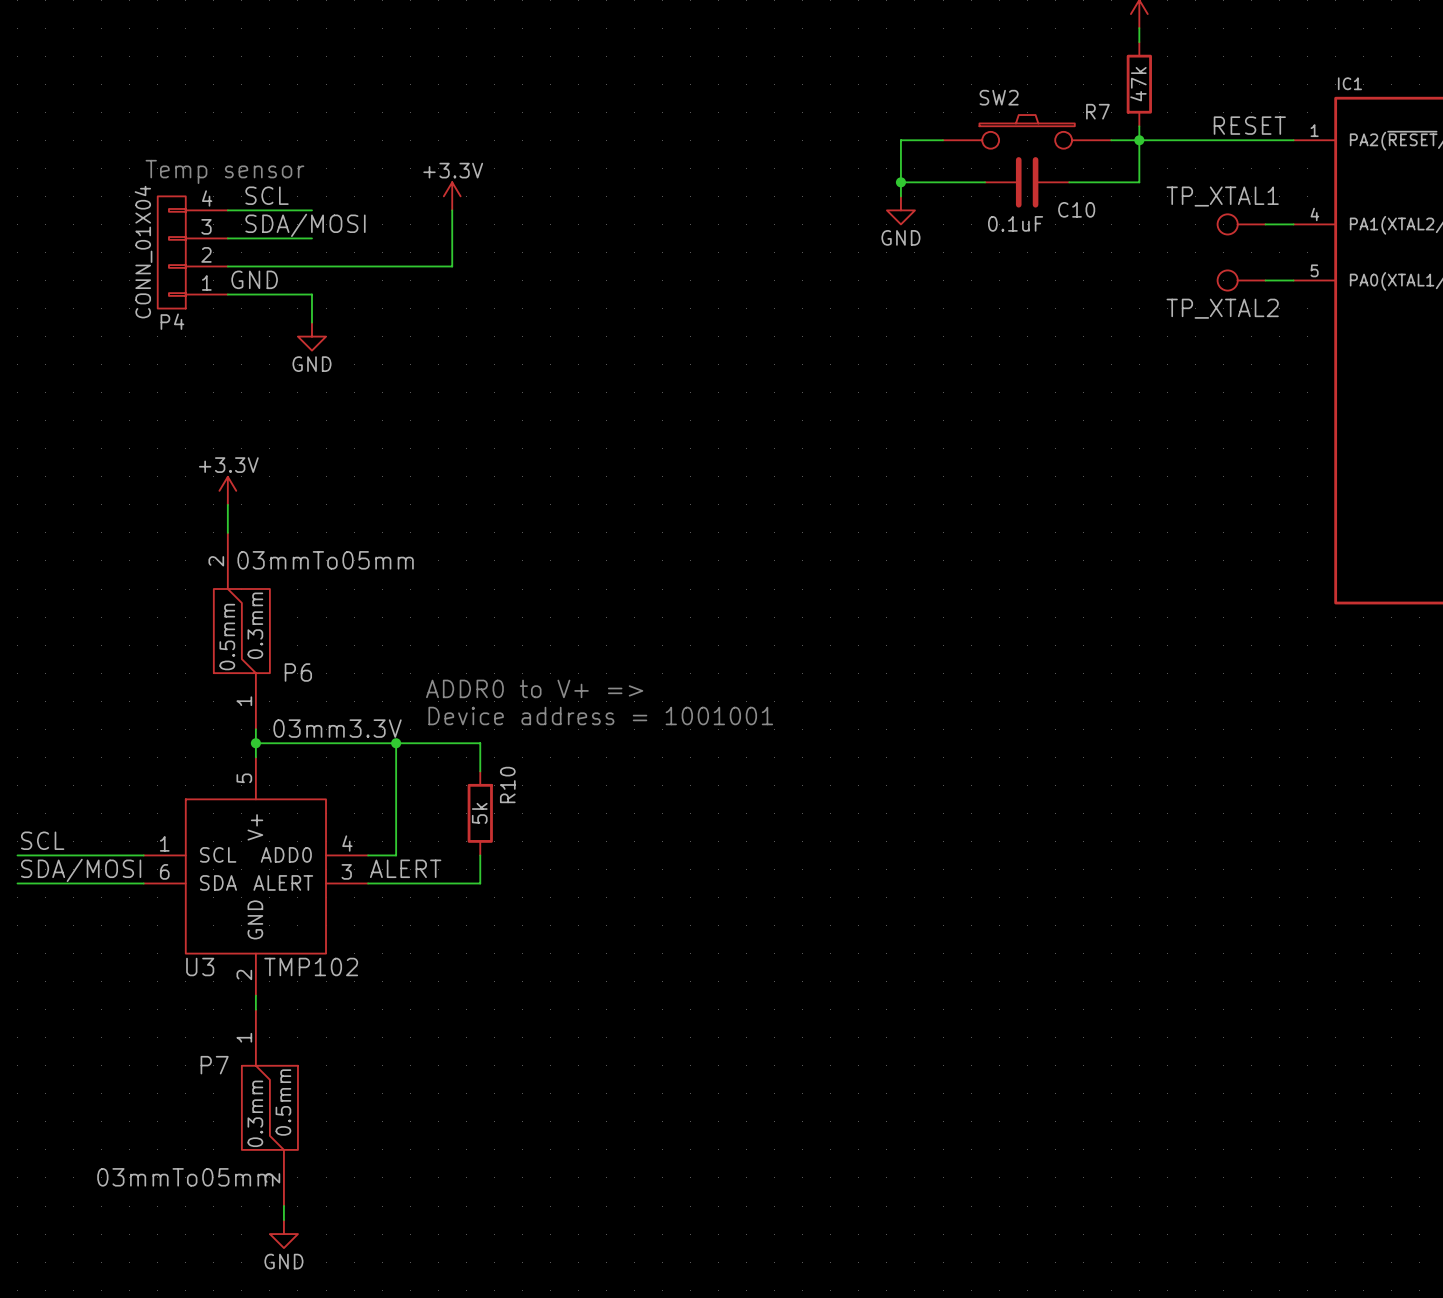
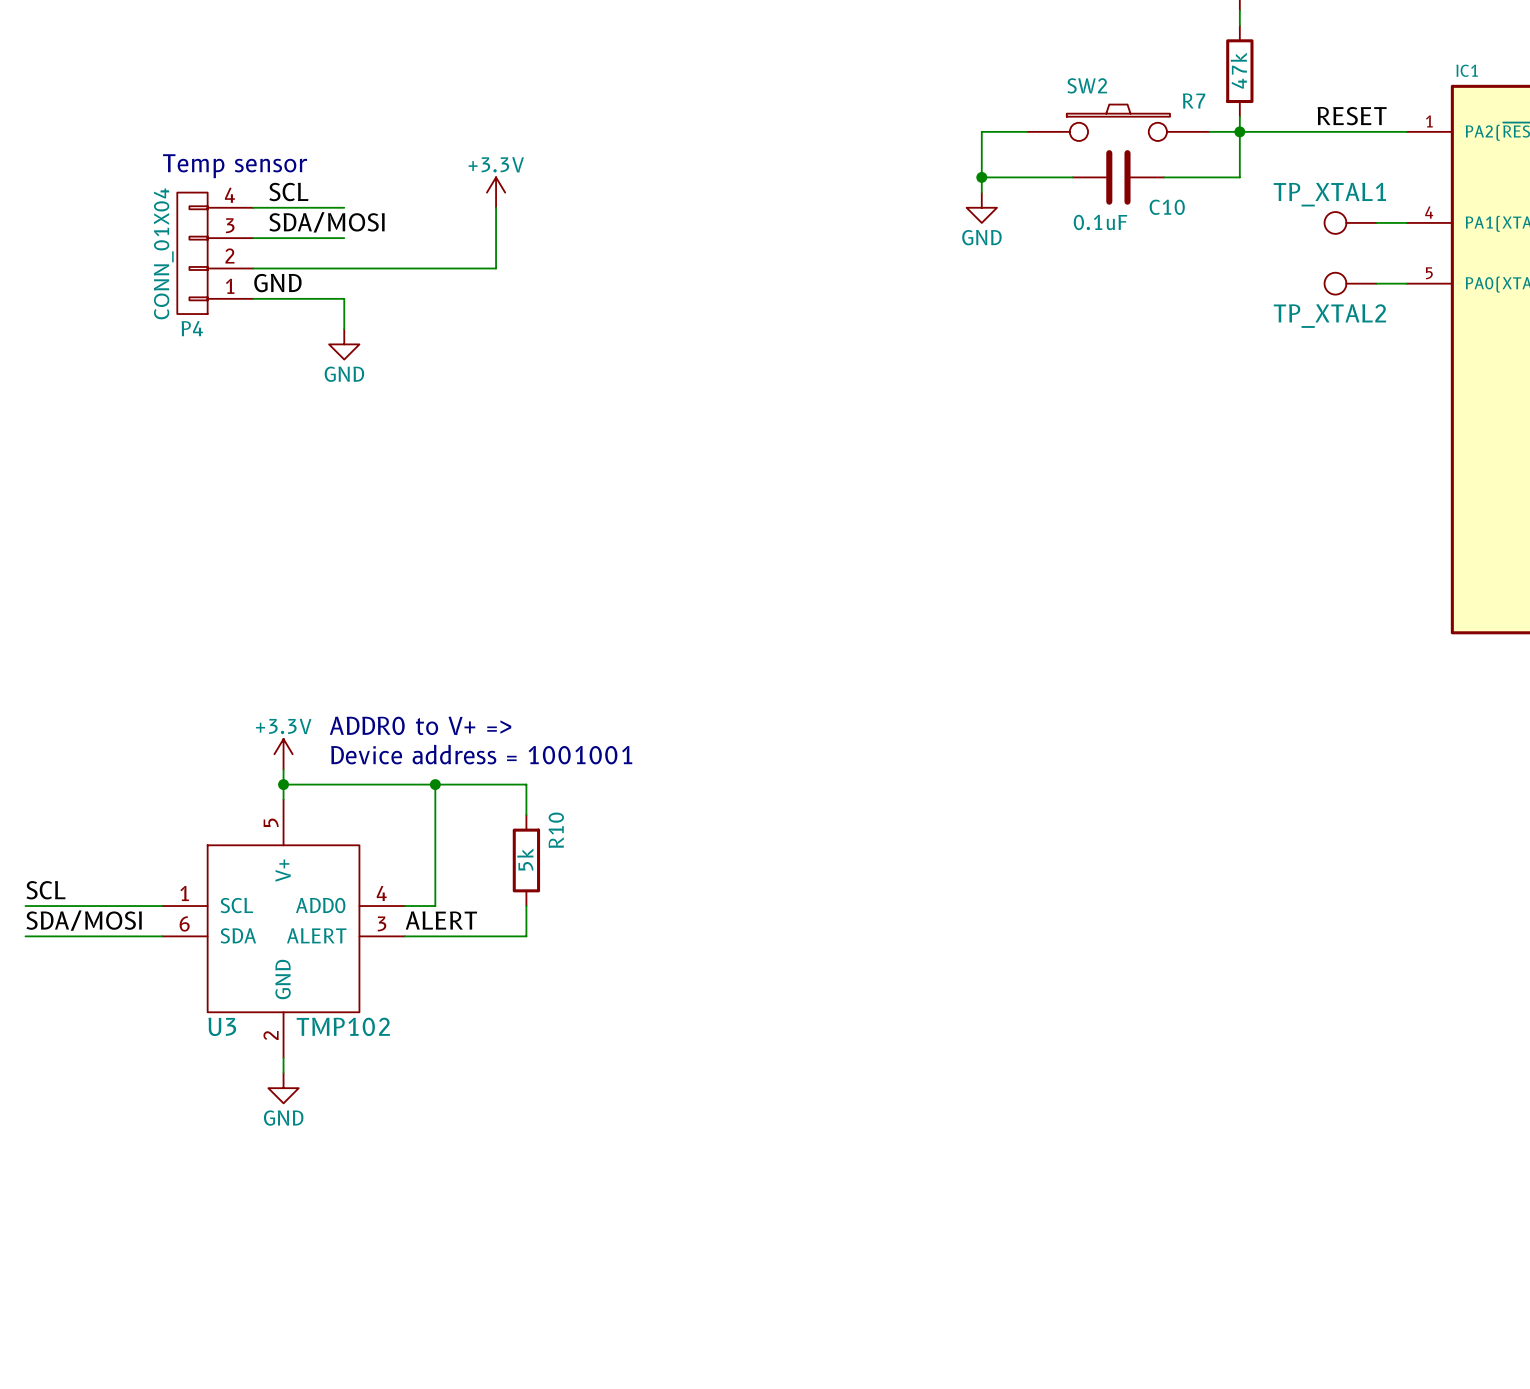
power symbol position: +3.3V (227, 490) -> +3.3V (283, 754)
wire: (227, 504) (227, 532) -> none
P6: 03mmTo05mm (241, 631) -> none
text position: ADDR0 to V+ => (534, 688) -> ADDR0 to V+ => (420, 725)
text position: Device address = 1001001 (600, 716) -> Device address = 1001001 (481, 754)
label: 03mm3.3V (337, 728) -> none
P7: 03mmTo05mm (269, 1107) -> none
wire: (283, 1206) (283, 1220) -> none
power symbol position: GND (283, 1234) -> GND (283, 1088)

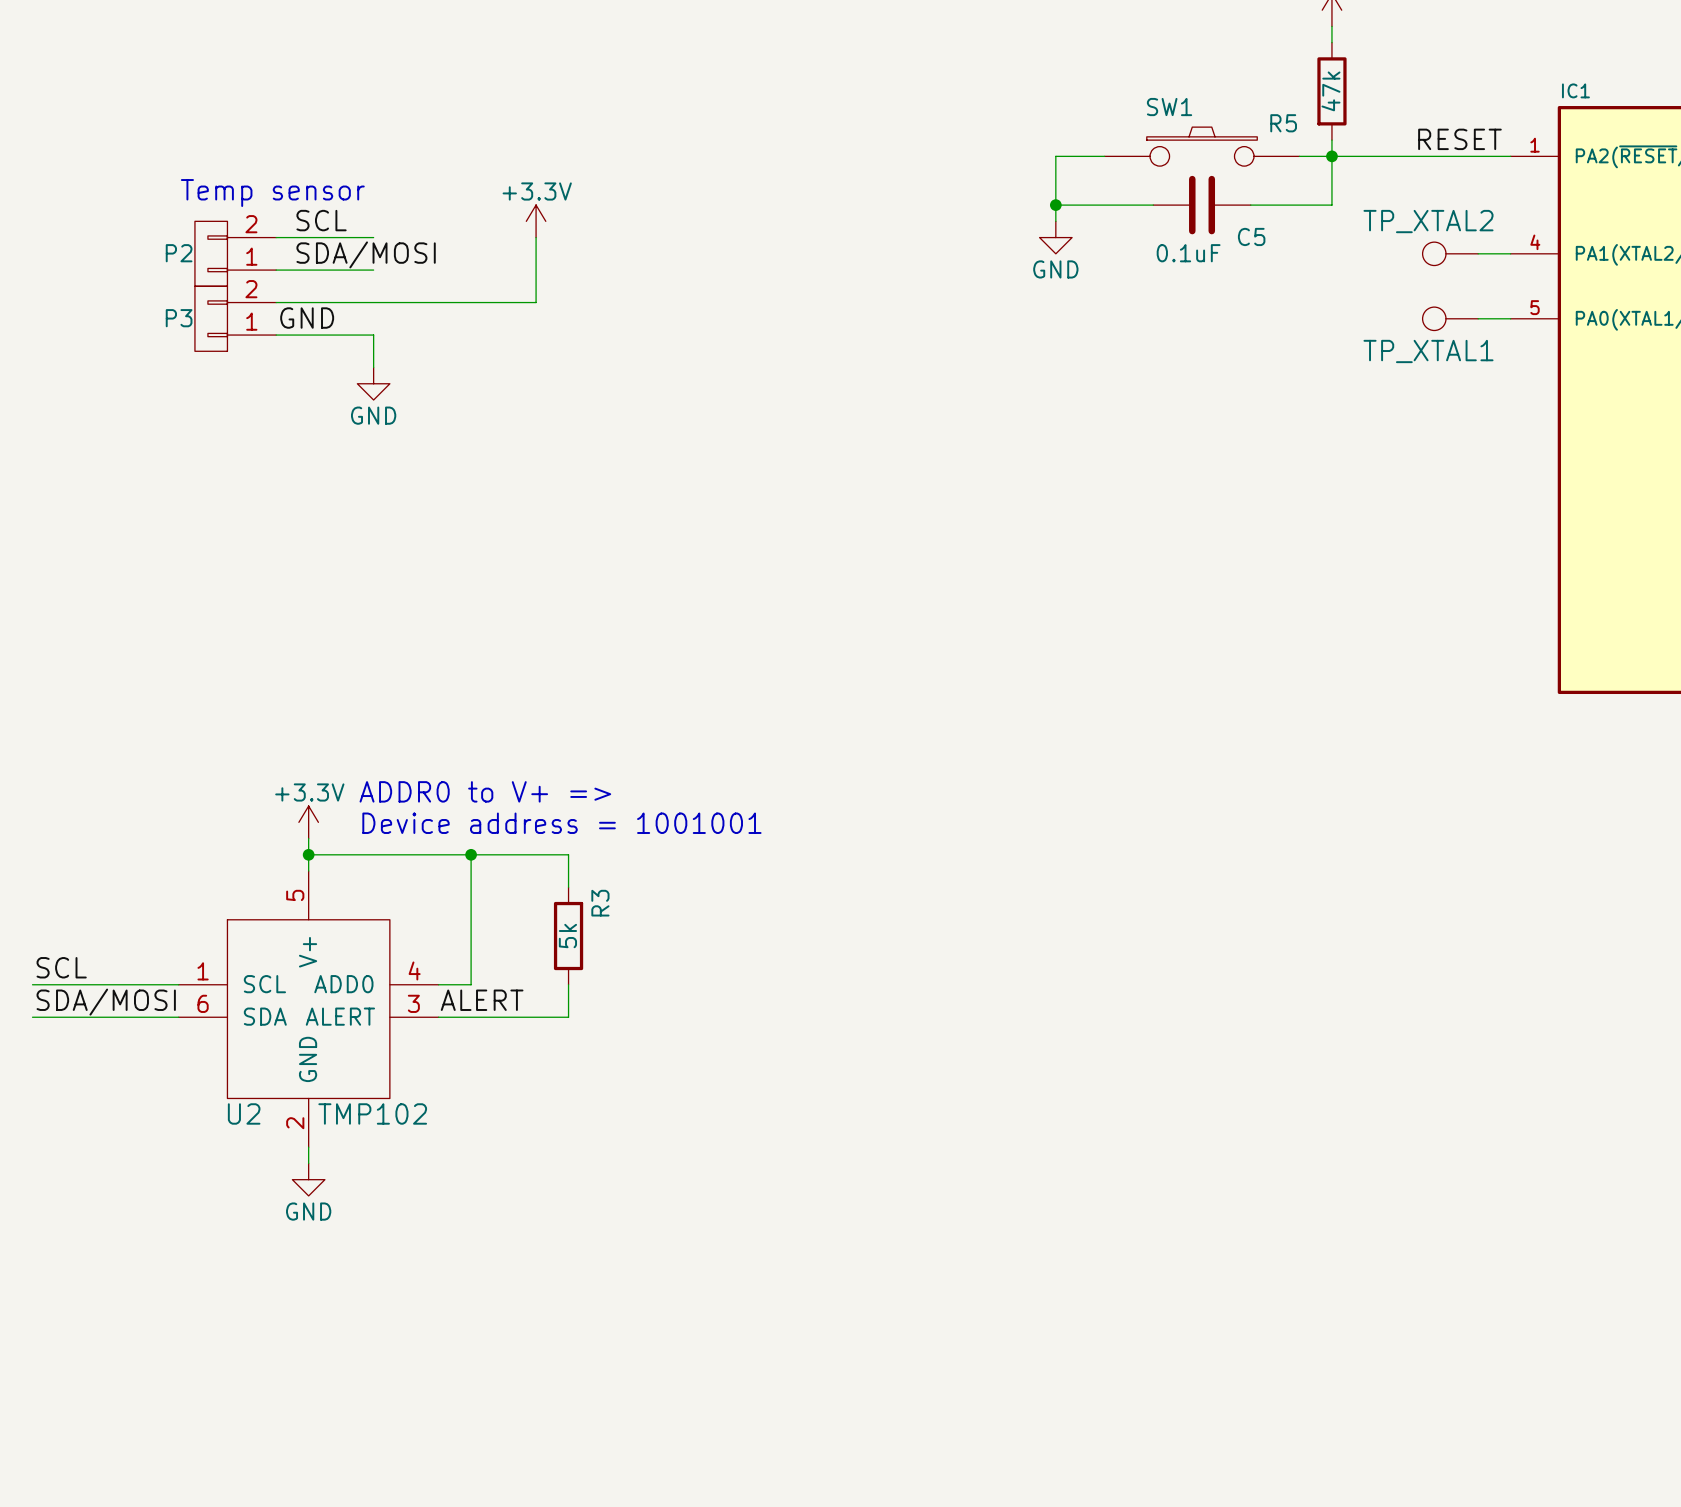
SW2 name: SW2 (1087, 85) -> SW1 (1169, 107)
R7 name: R7 (1194, 100) -> R5 (1283, 123)
TP_XTAL1 name: TP_XTAL1 (1329, 194) -> TP_XTAL2 (1428, 221)
C10 name: C10 (1167, 207) -> C5 (1251, 236)
P2: none -> (235, 253)
P4: CONN_01X04 (215, 253) -> none
P3: none -> (235, 318)
TP_XTAL2 name: TP_XTAL2 (1329, 316) -> TP_XTAL1 (1428, 351)
R10 name: R10 (556, 830) -> R3 (600, 903)
U3 name: U3 (222, 1026) -> U2 (244, 1113)

